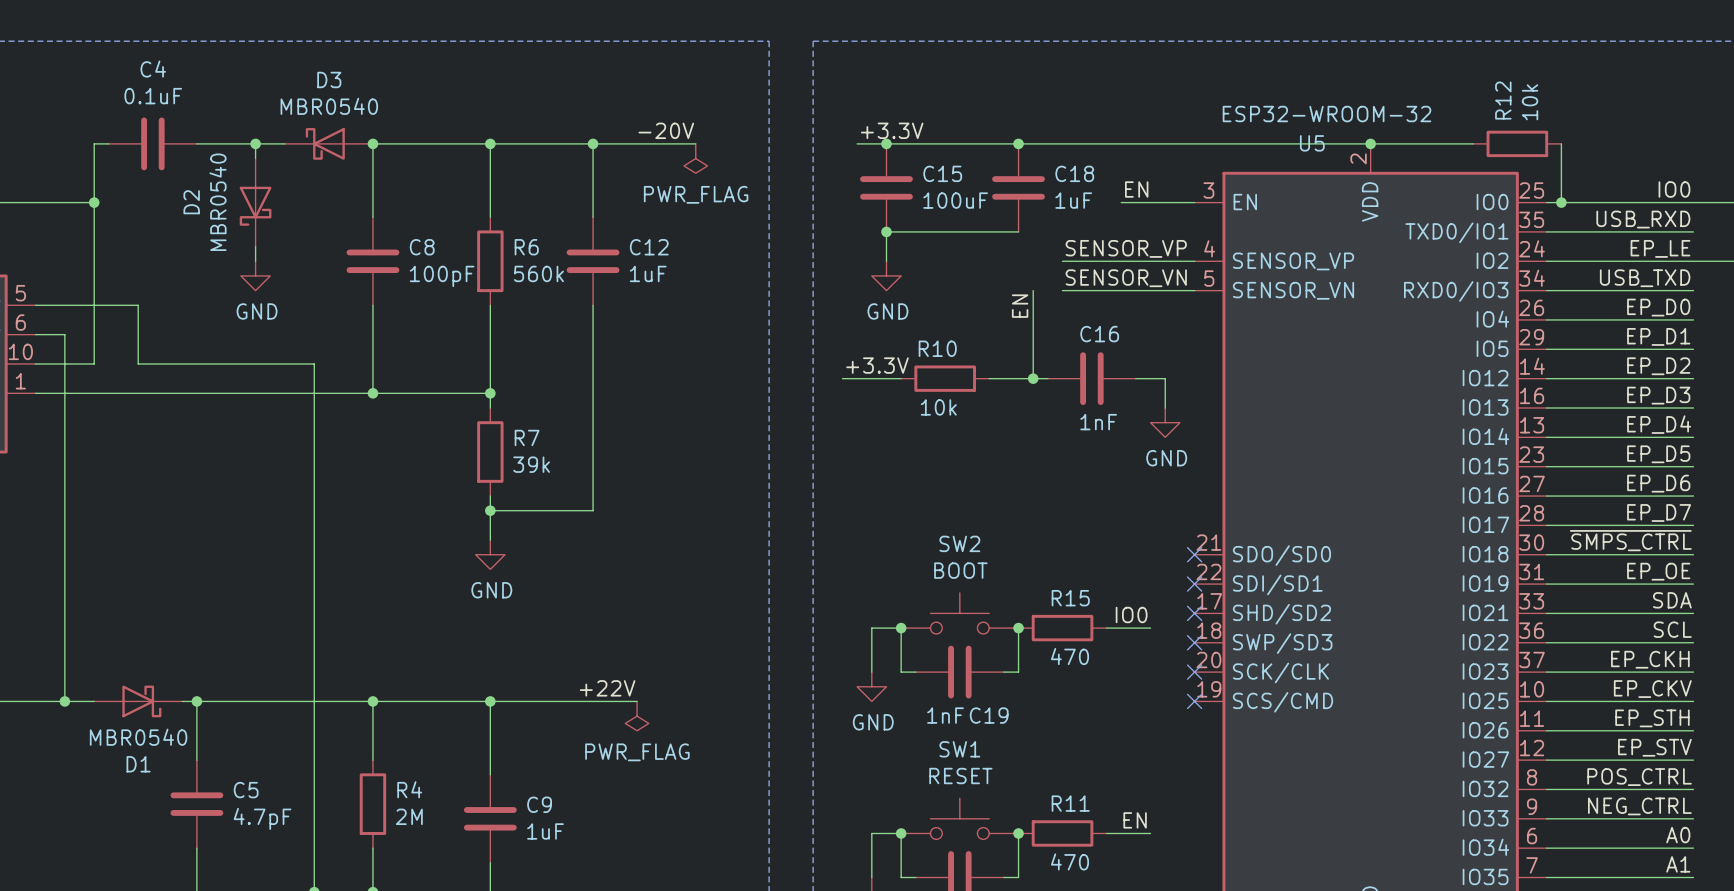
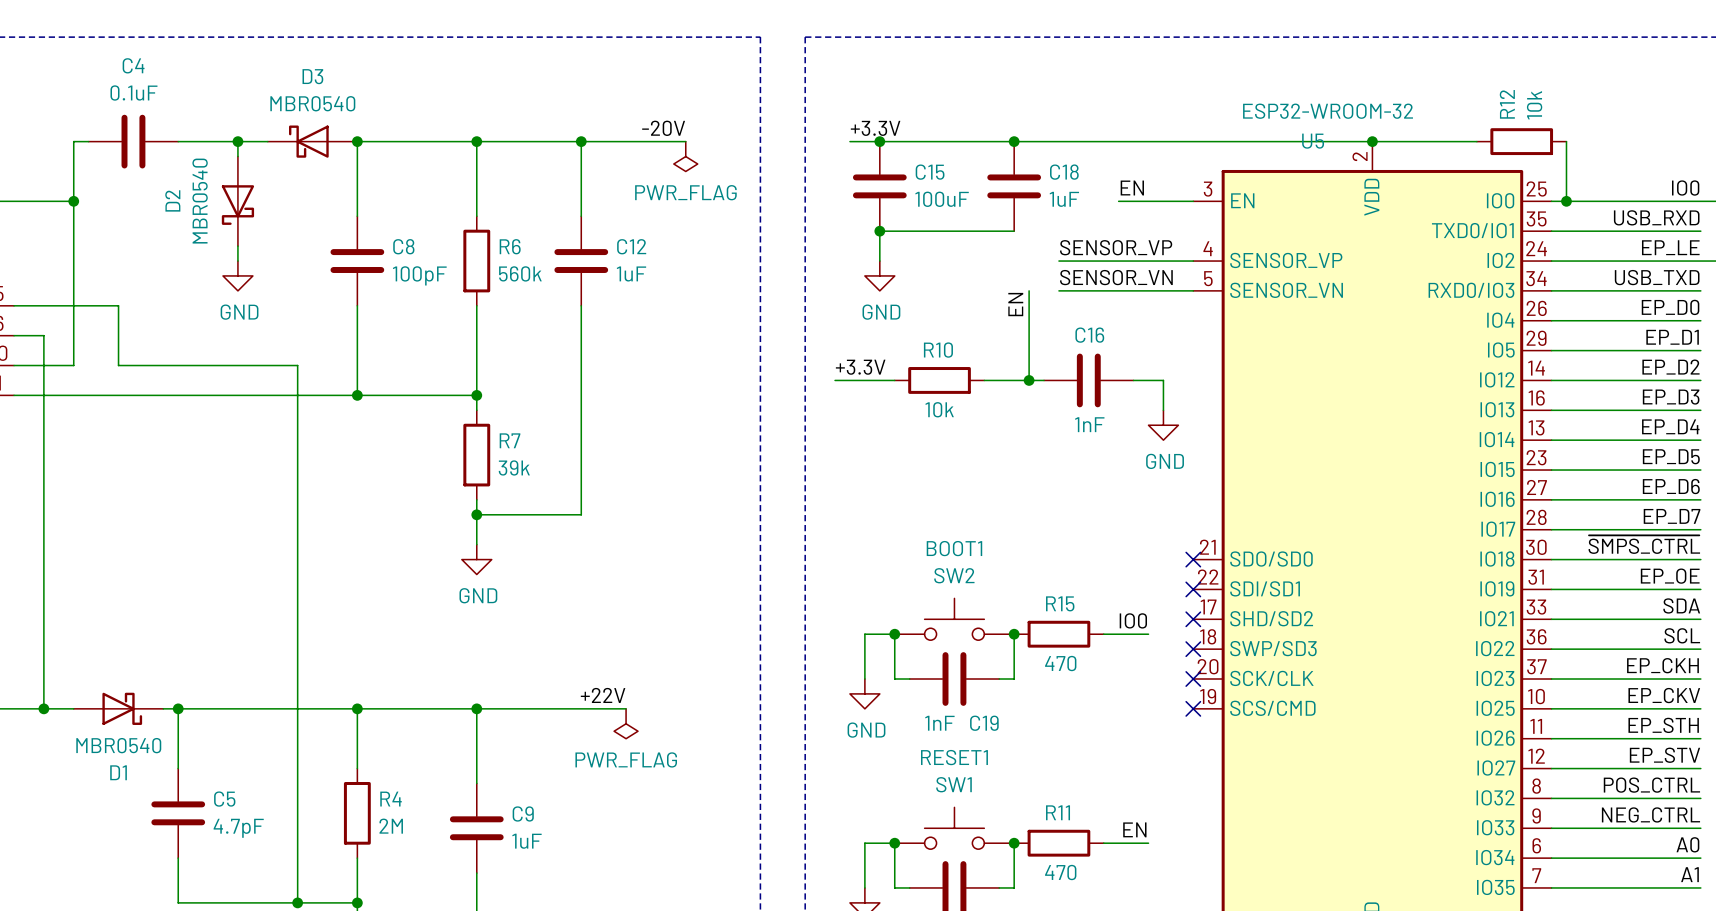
SW2 name: SW2 (959, 543) -> BOOT1 (954, 548)
SW2 value: BOOT (960, 570) -> SW2 (954, 575)
SW1 name: SW1 (959, 749) -> RESET1 (954, 757)
SW1 value: RESET (960, 776) -> SW1 (954, 784)

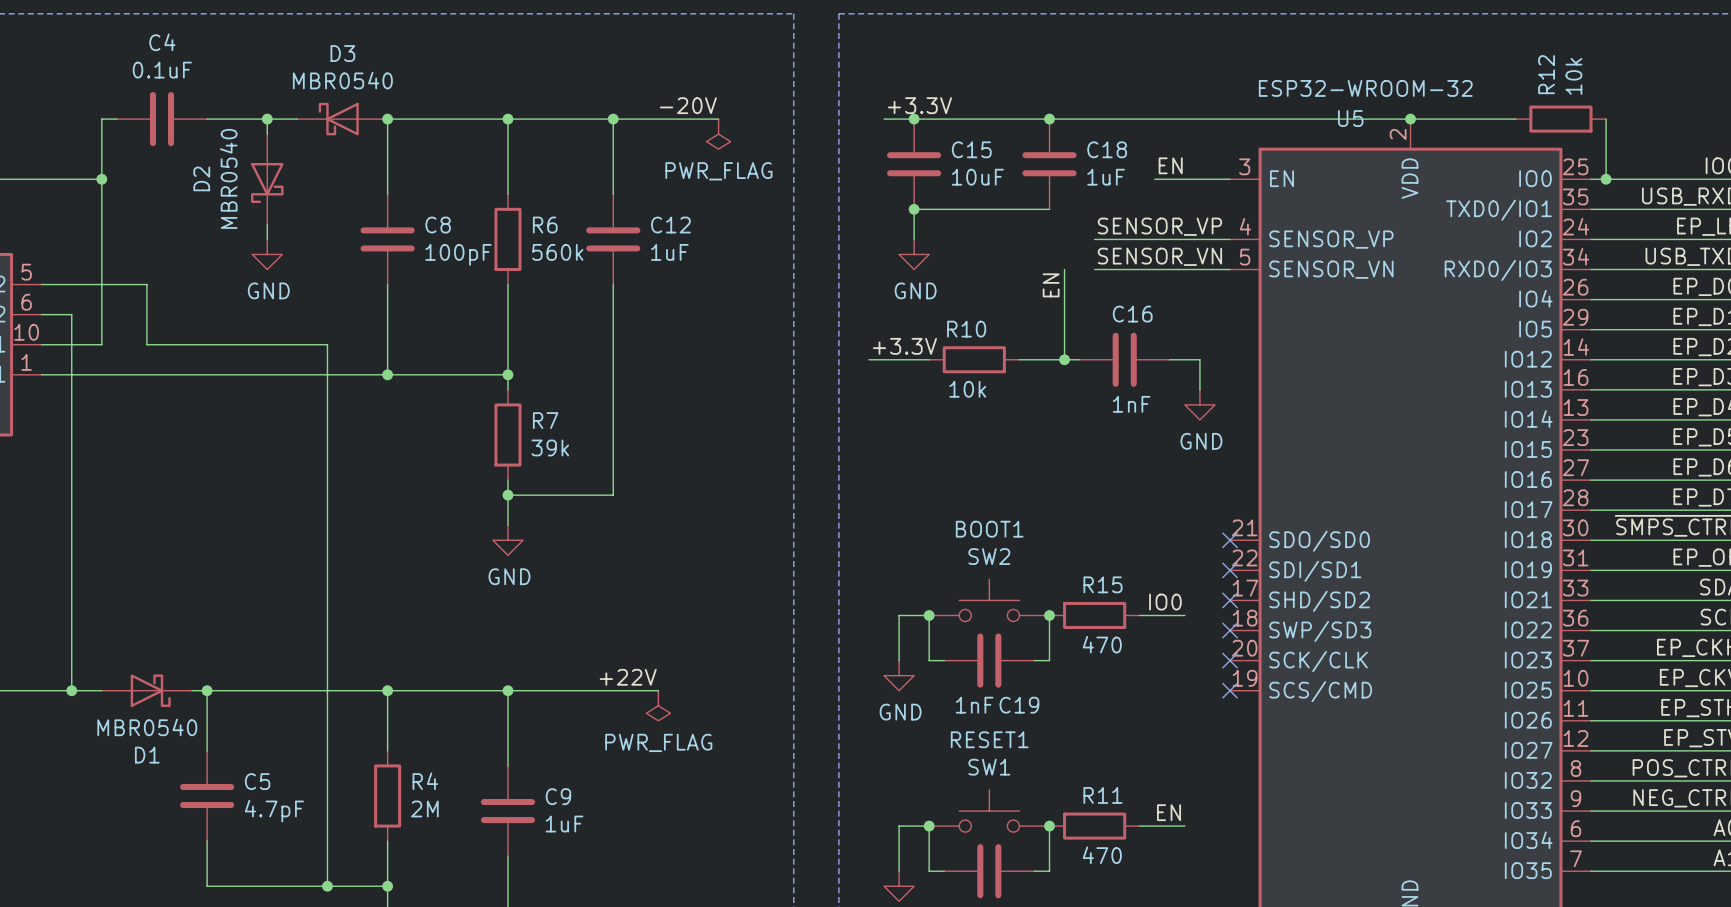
C15 value: 100uF (942, 199) -> 10uF (977, 177)

